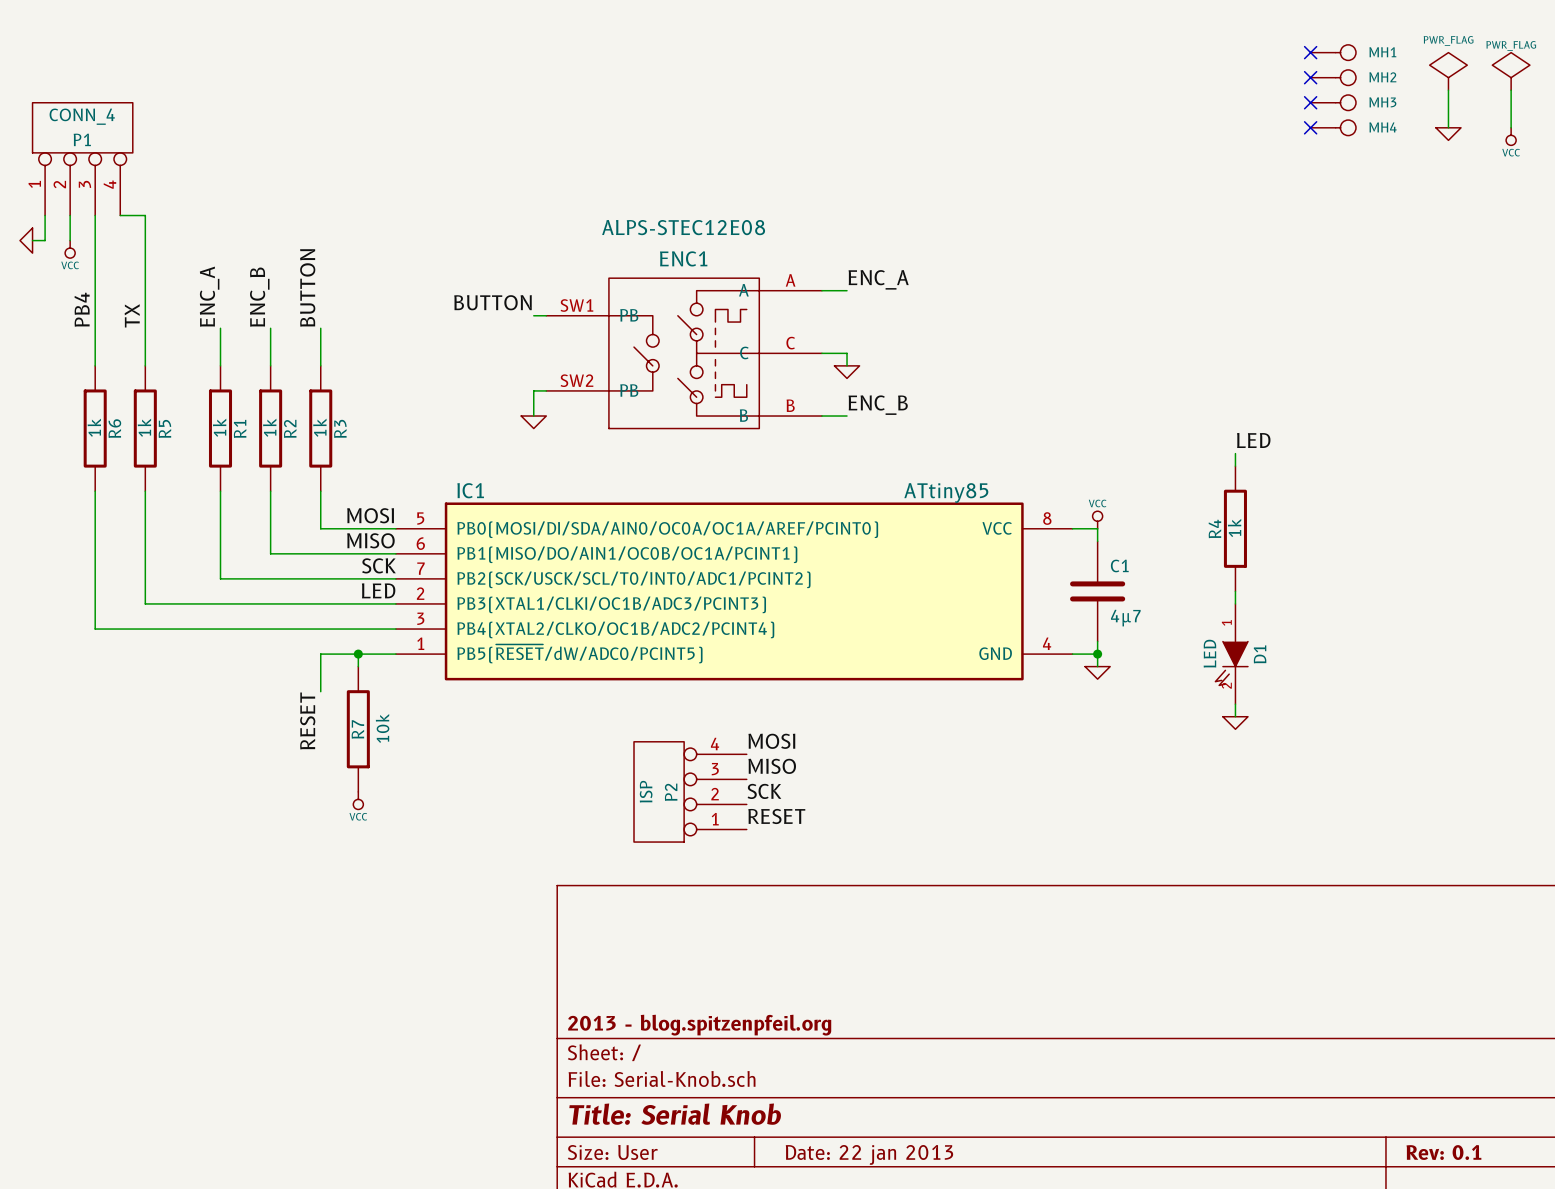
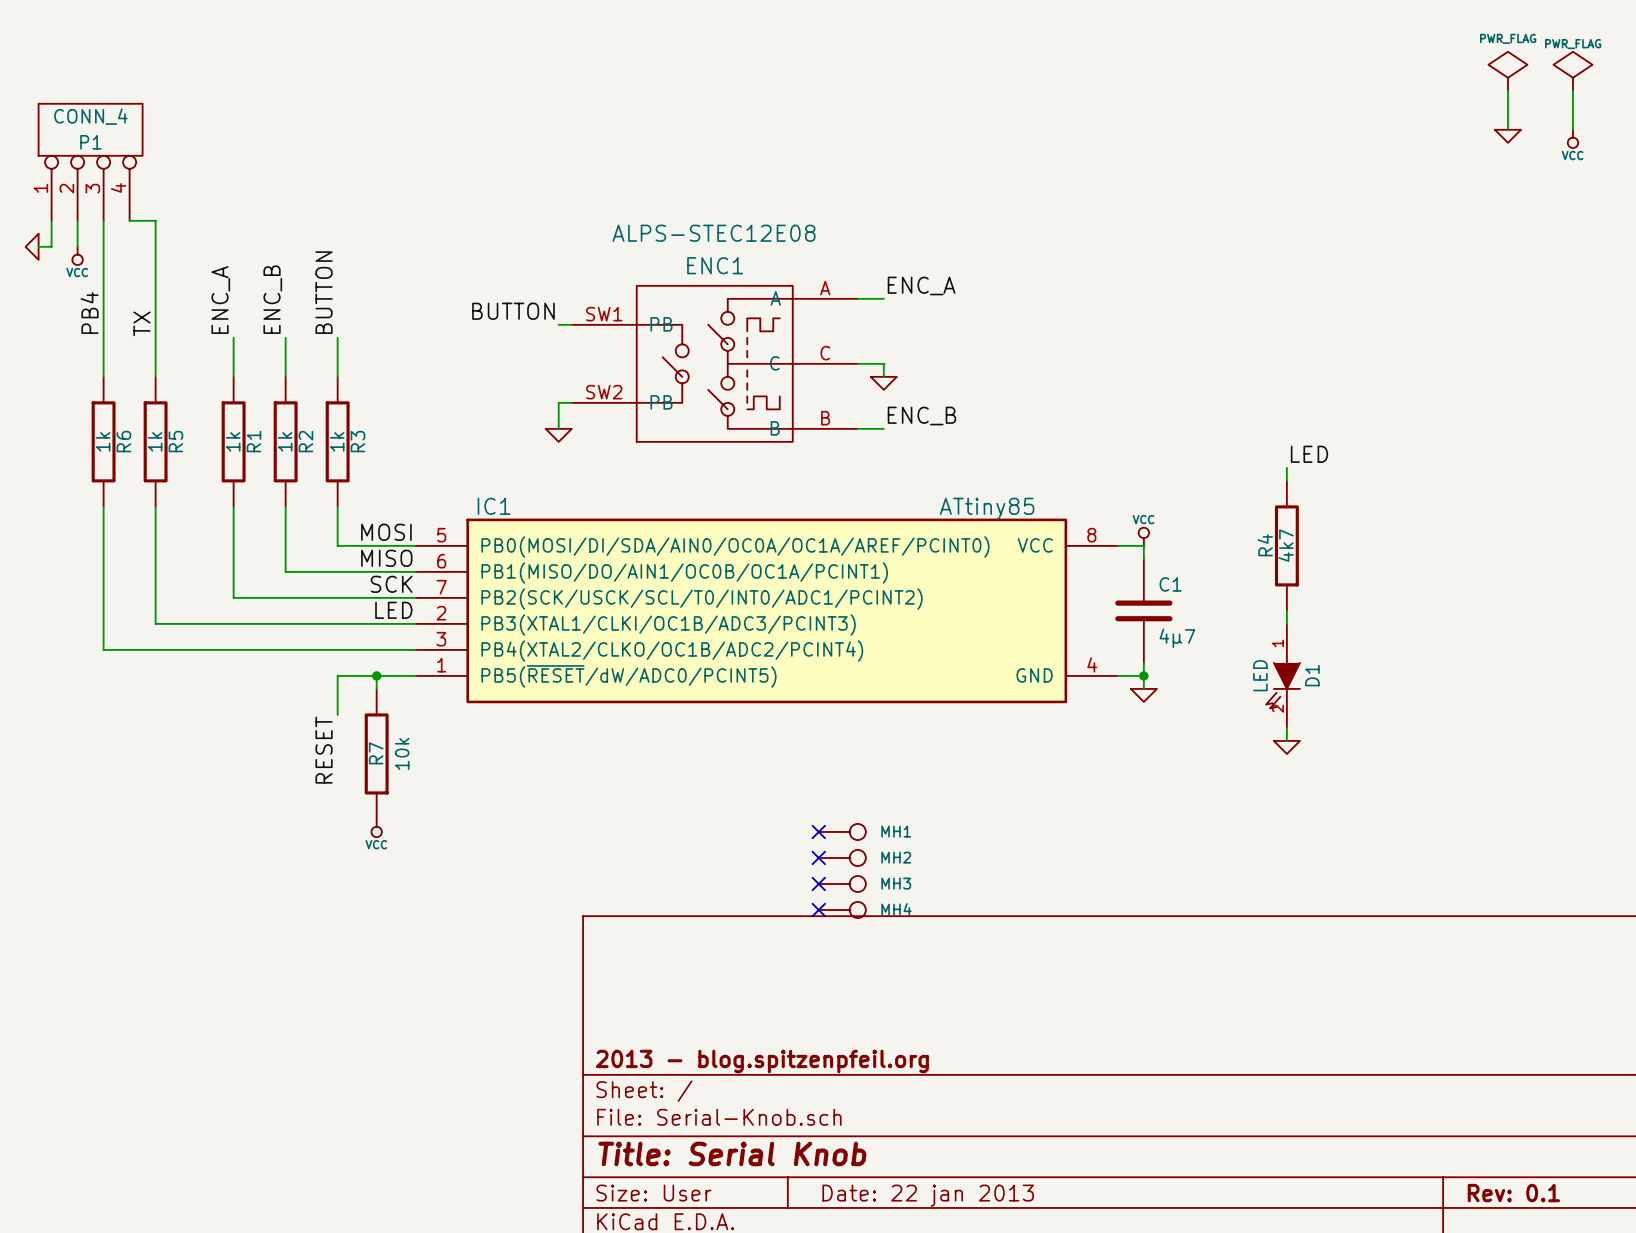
no-connect mark: (1310, 52) -> none
MH1 position: (1333, 52) -> (842, 831)
no-connect mark: (1310, 77) -> none
MH2 position: (1333, 77) -> (842, 857)
no-connect mark: (1310, 102) -> none
MH3 position: (1333, 102) -> (842, 883)
no-connect mark: (1310, 127) -> none
MH4 position: (1333, 127) -> (842, 909)
R4 value: 1k (1234, 527) -> 4k7 (1286, 545)
label: MOSI (771, 741) -> none
label: MISO (772, 766) -> none
P2: ISP (690, 791) -> none
label: SCK (764, 791) -> none
no-connect mark: none -> (818, 831)
label: RESET (776, 816) -> none
no-connect mark: none -> (818, 857)
no-connect mark: none -> (818, 883)
no-connect mark: none -> (818, 909)

